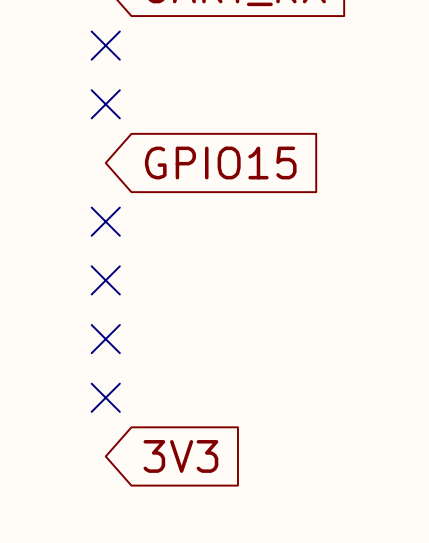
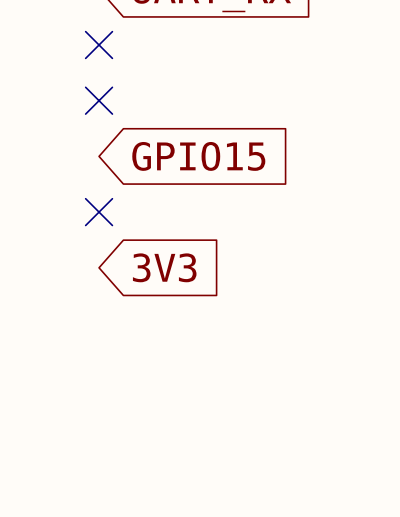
no-connect mark: (105, 280) -> none
no-connect mark: (105, 339) -> none
no-connect mark: (105, 397) -> none
global label position: 3V3 (180, 456) -> 3V3 (164, 267)

